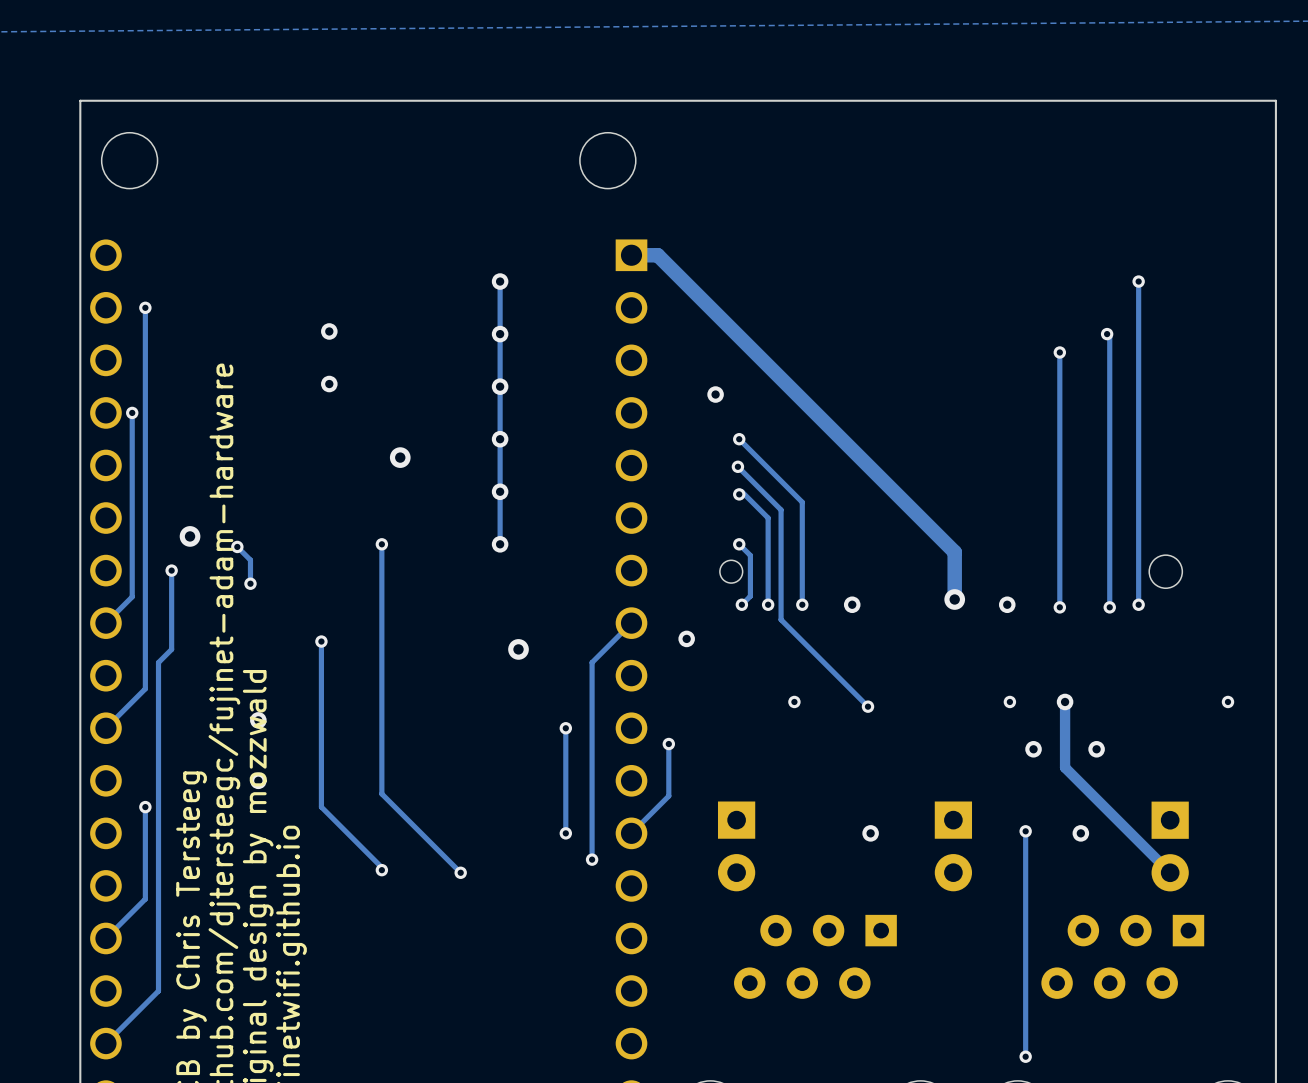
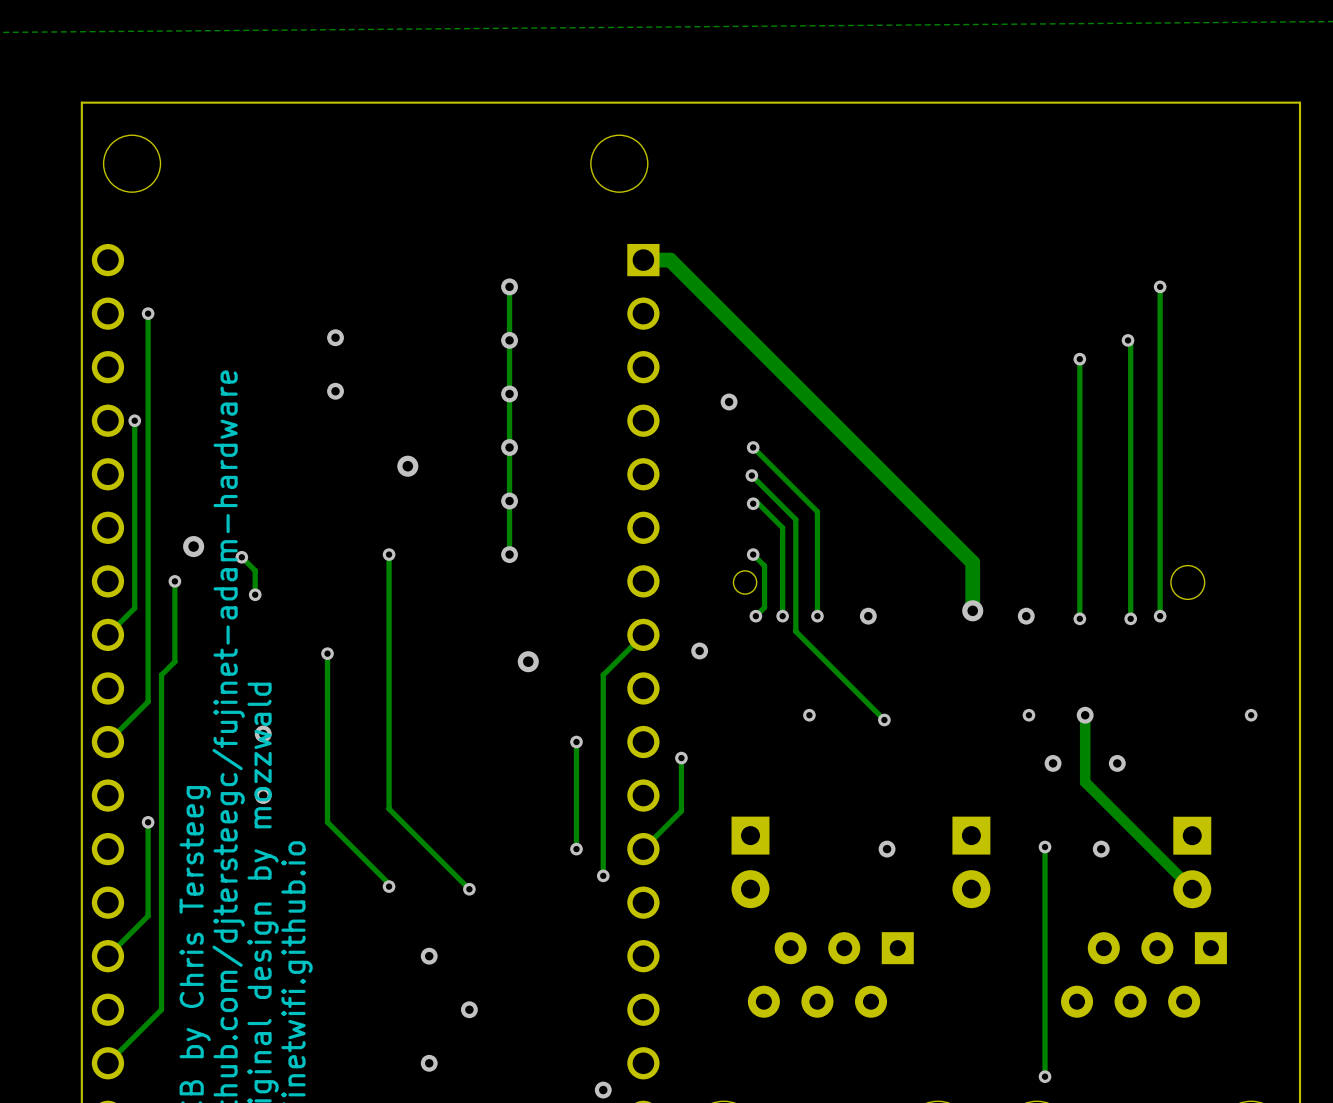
via: none -> (429, 956)
via: none -> (469, 1009)
via: none -> (429, 1063)
via: none -> (603, 1090)

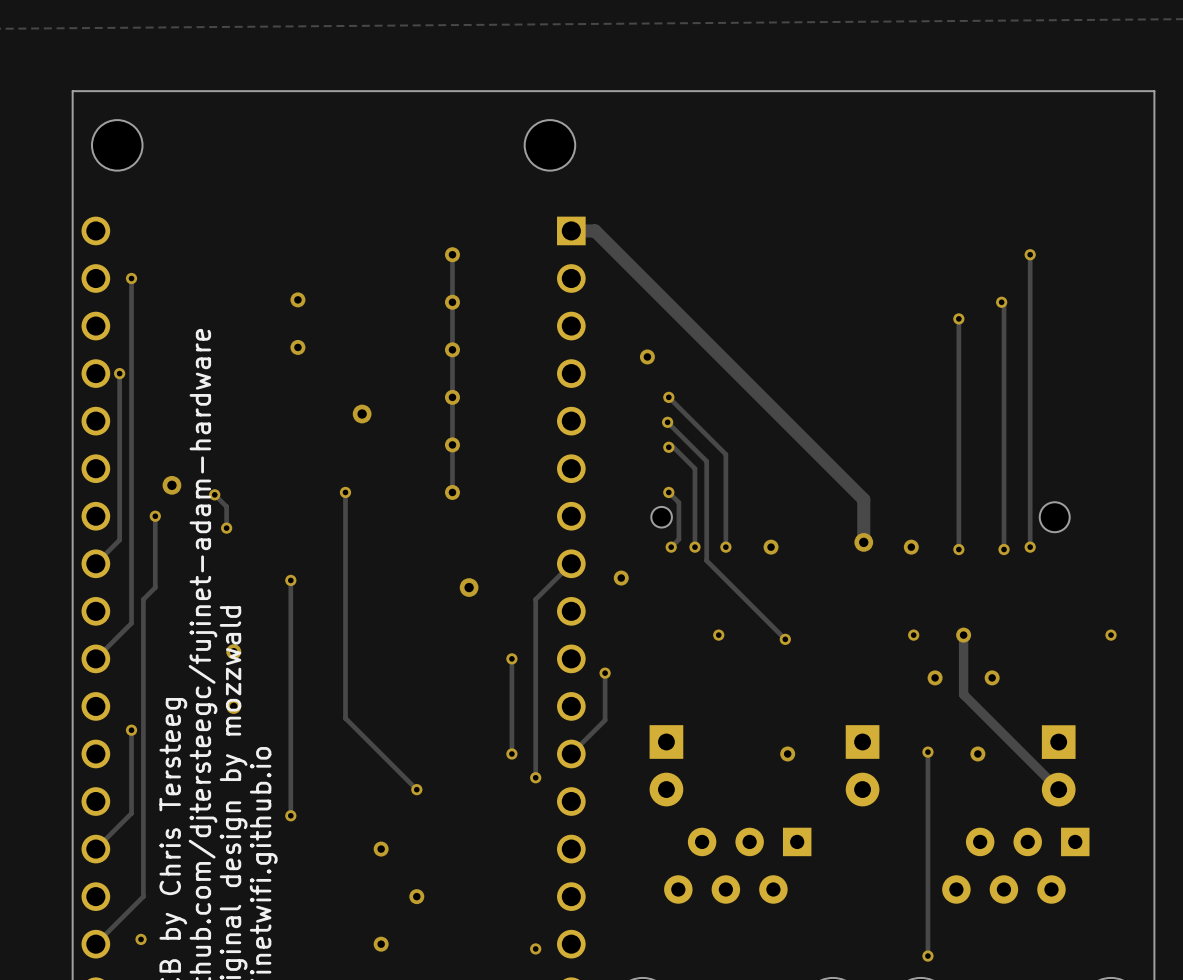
track: (327, 822) (389, 883) (389, 886) -> (290, 730) (290, 815)
via position: (389, 886) -> (290, 815)
via: none -> (141, 939)
via: none -> (535, 948)
via: (603, 1090) -> none

